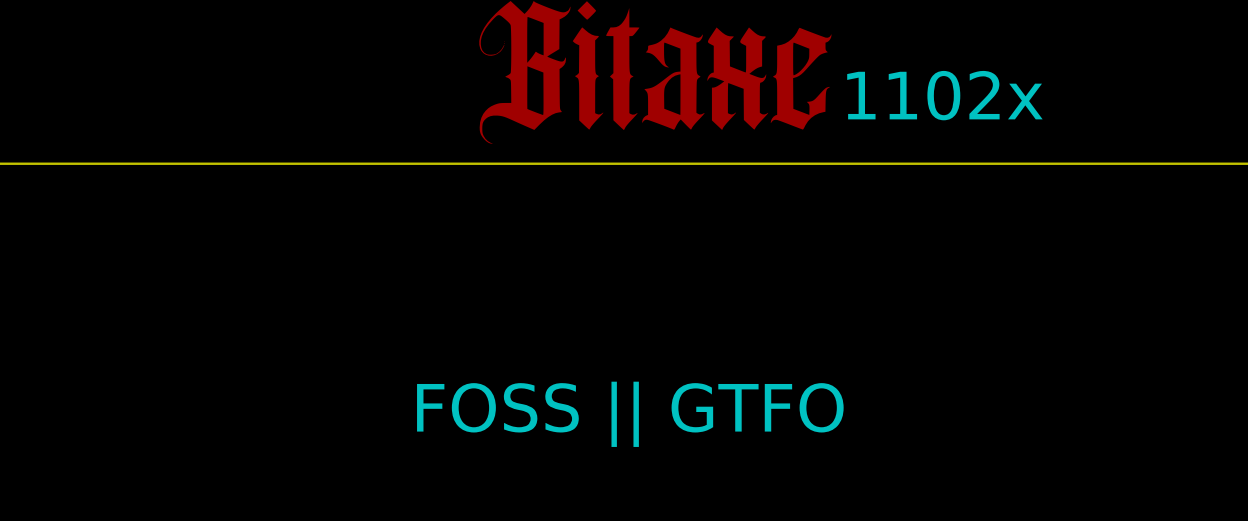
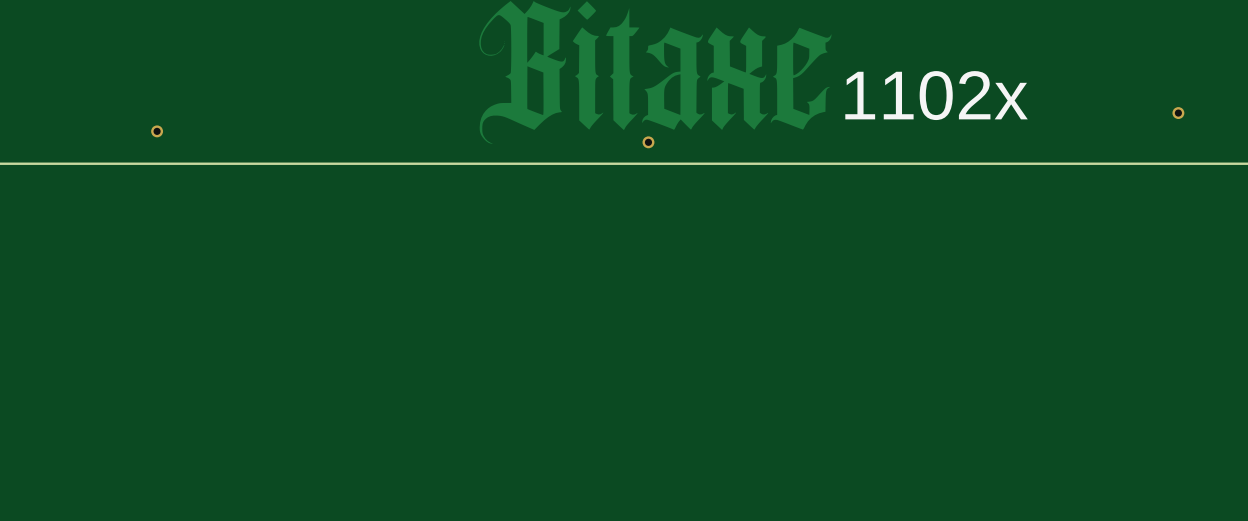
via: none -> (1178, 113)
via: none -> (157, 131)
via: none -> (648, 142)
text: FOSS || GTFO (630, 414) -> none

